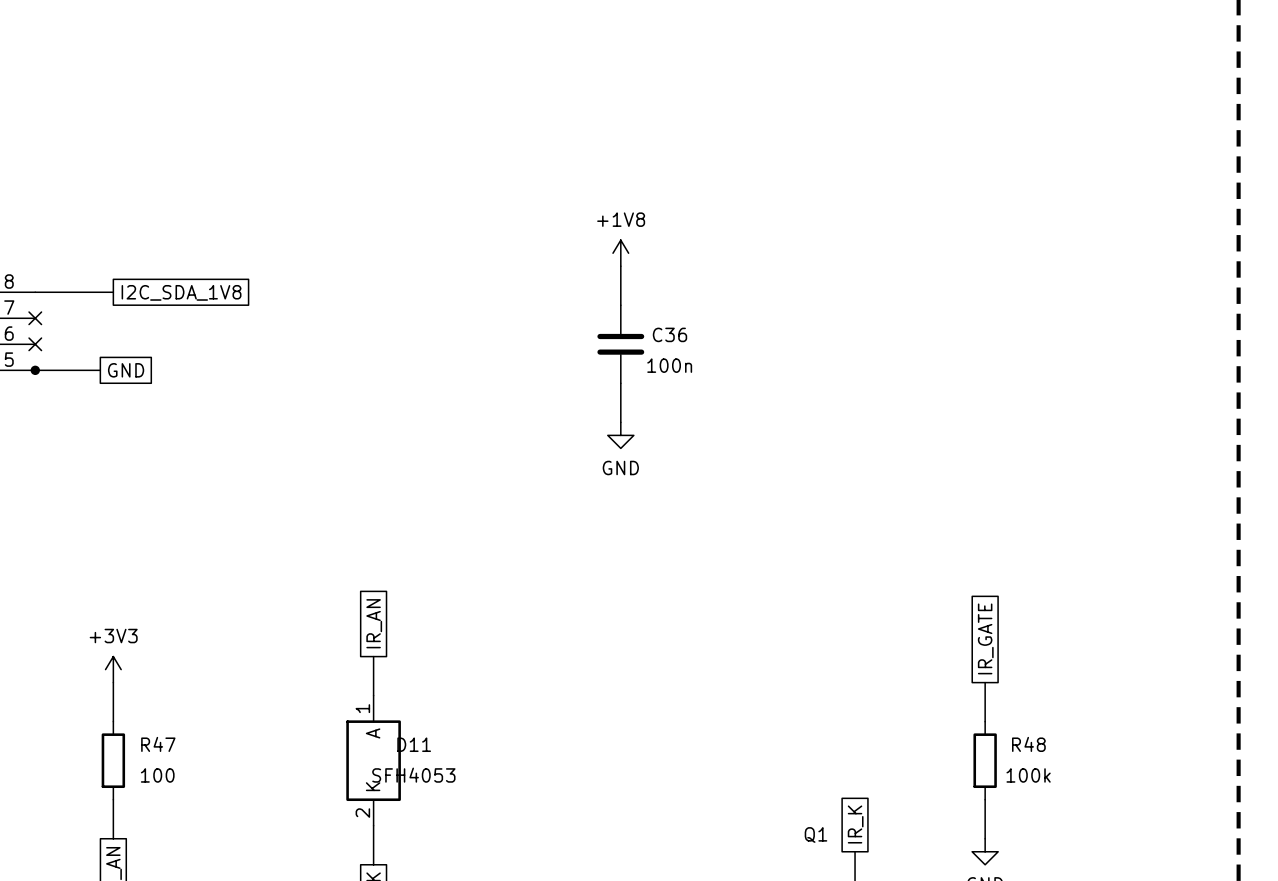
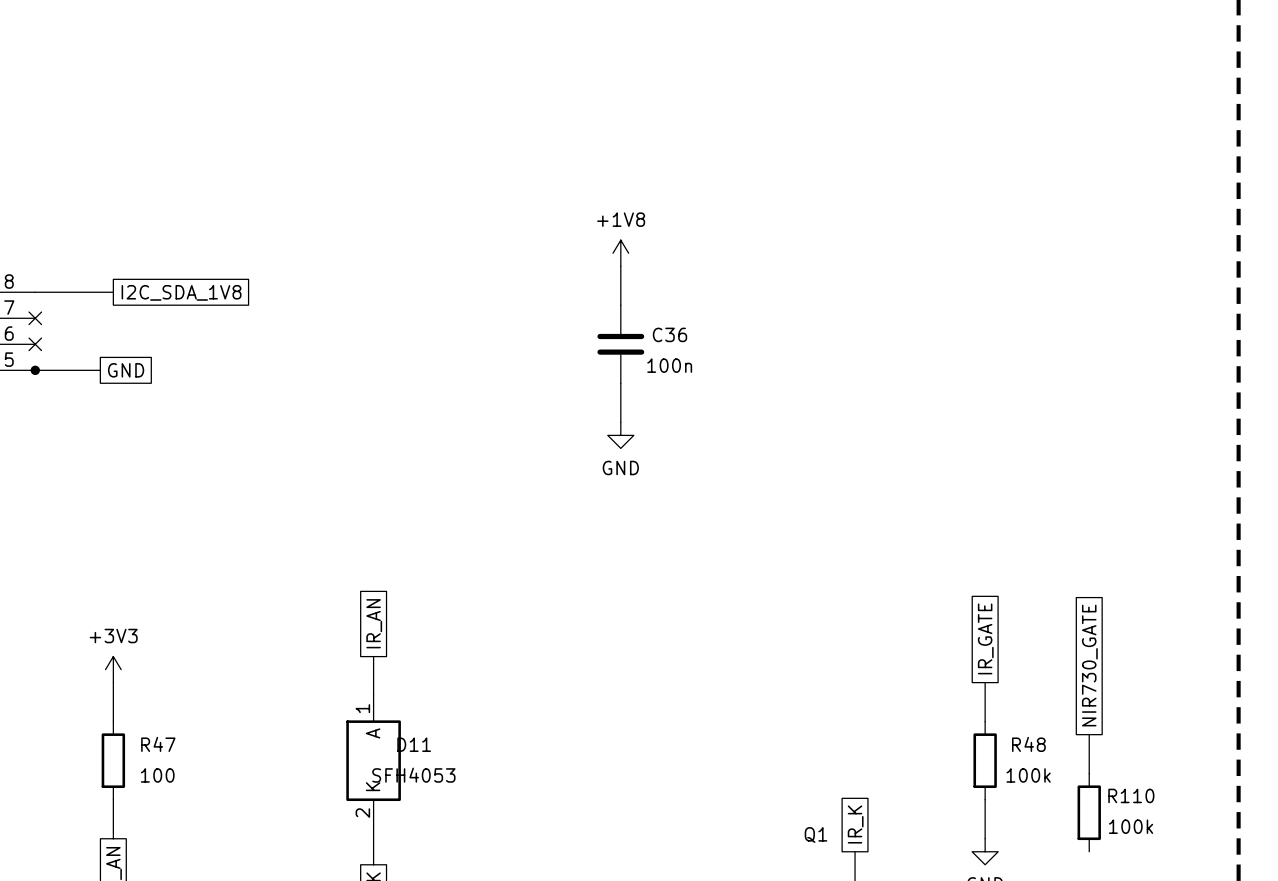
global label: none -> NIR730_GATE (1089, 665)
wire: none -> (1089, 734) (1089, 773)
R110: none -> 100k (1089, 812)

